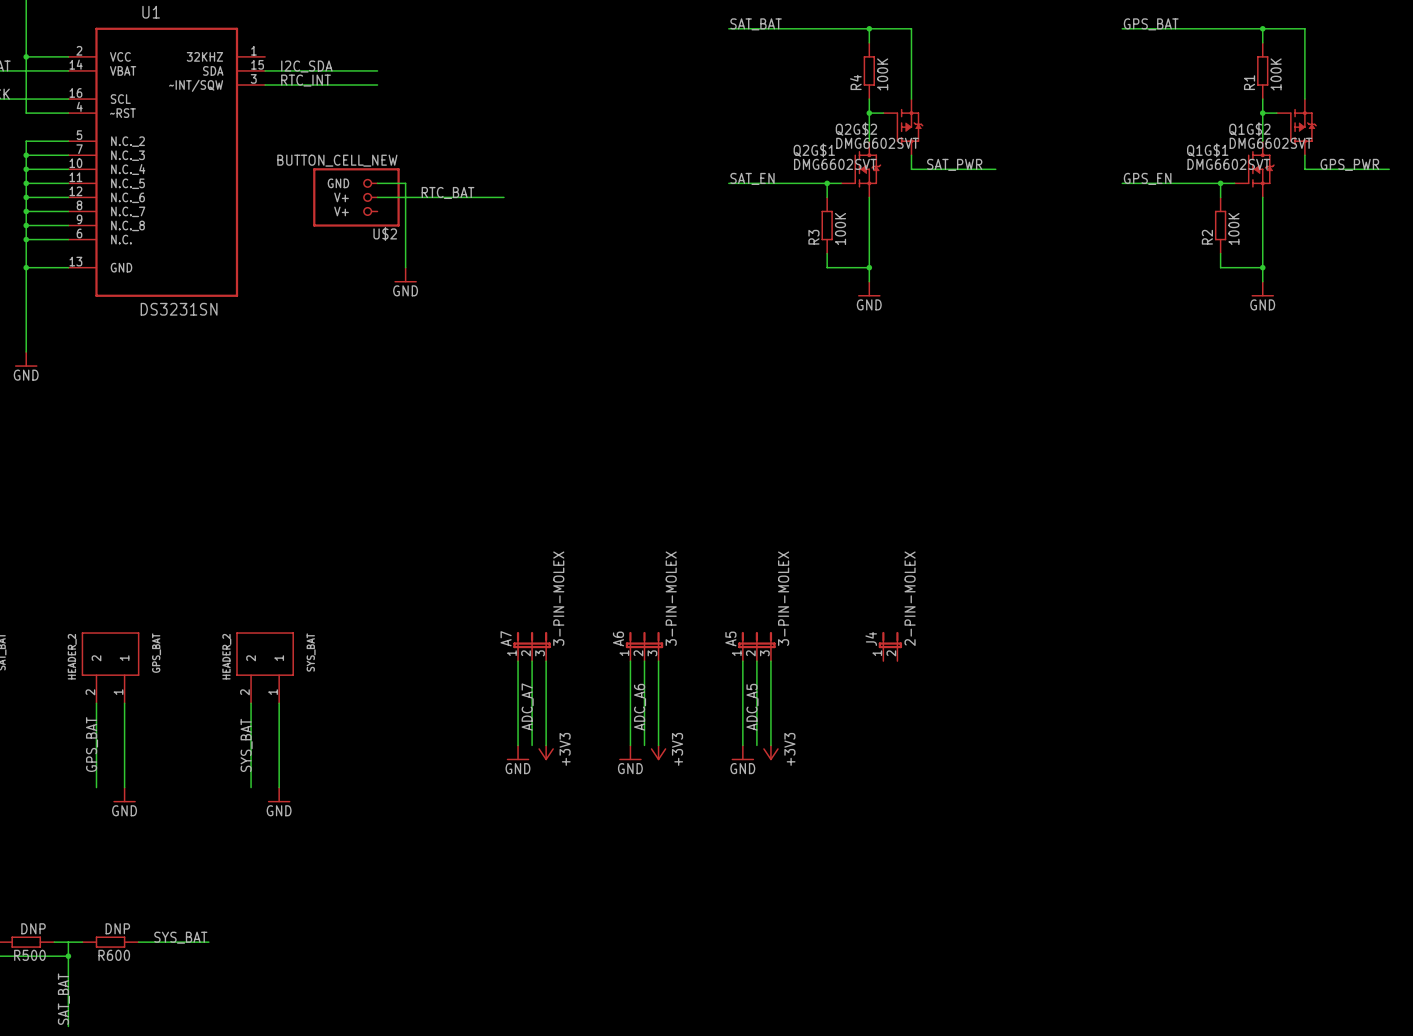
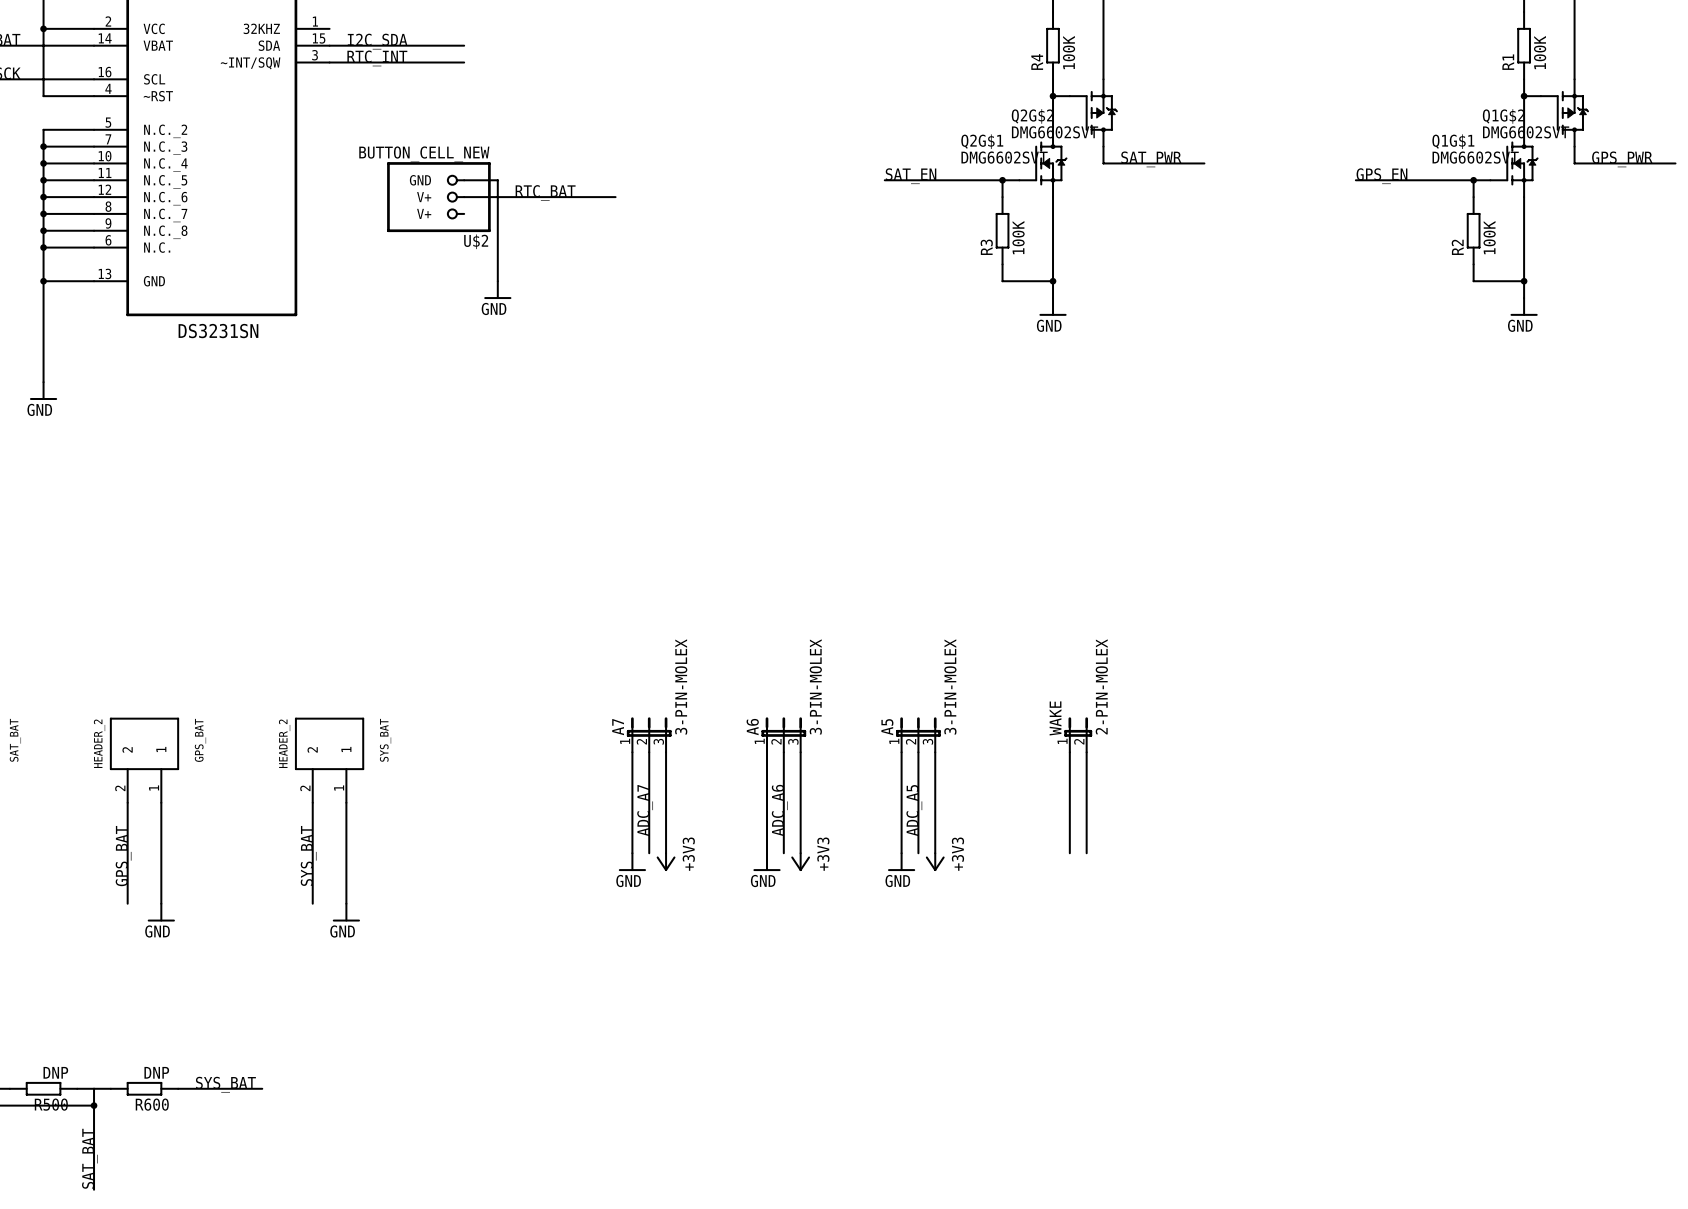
J4 name: J4 (871, 638) -> WAKE (1055, 718)
wire: none -> (1069, 752) (1069, 853)
wire: none -> (1086, 752) (1086, 853)

